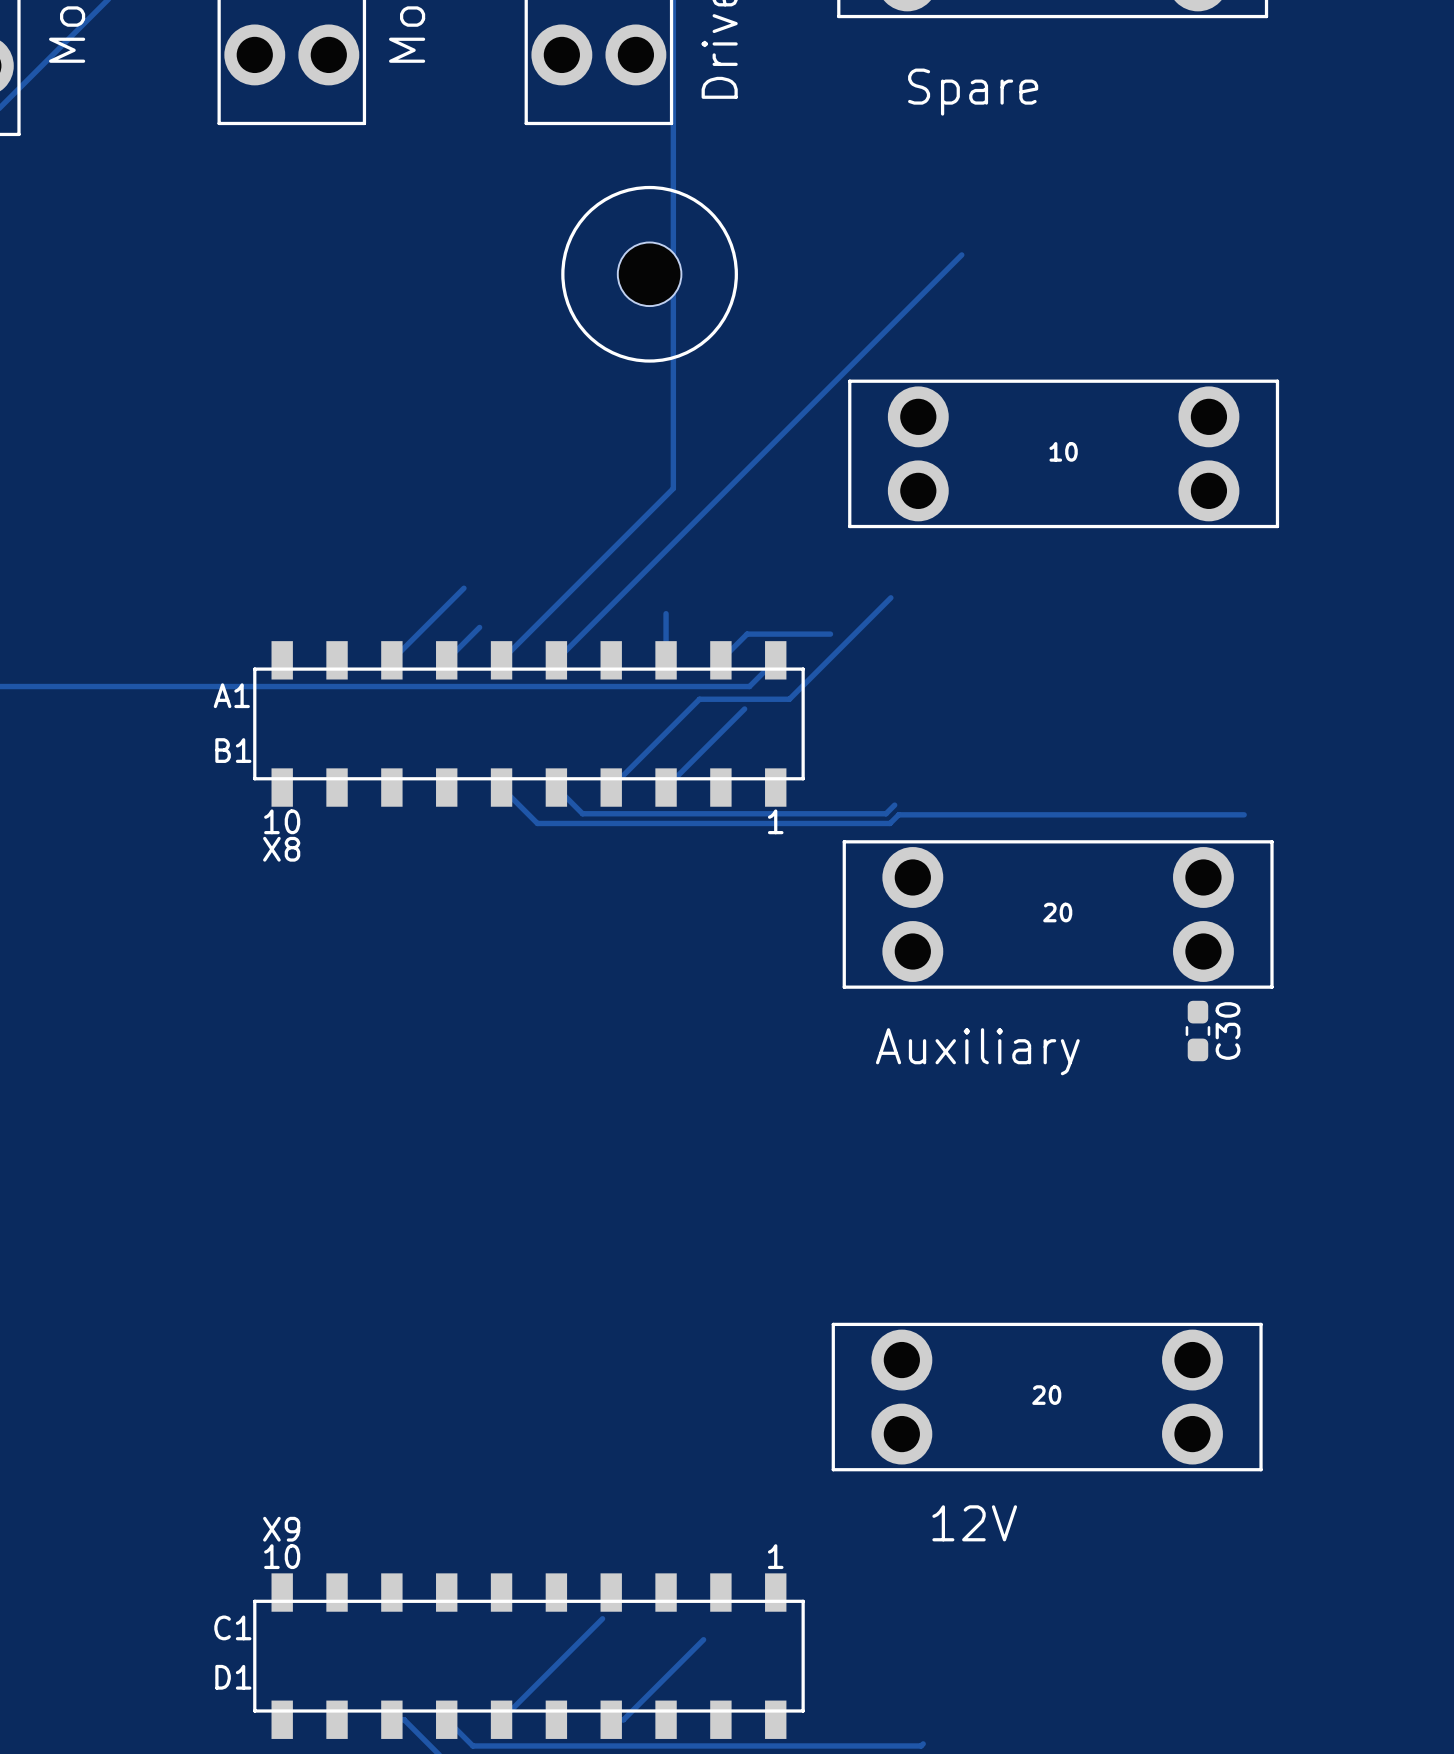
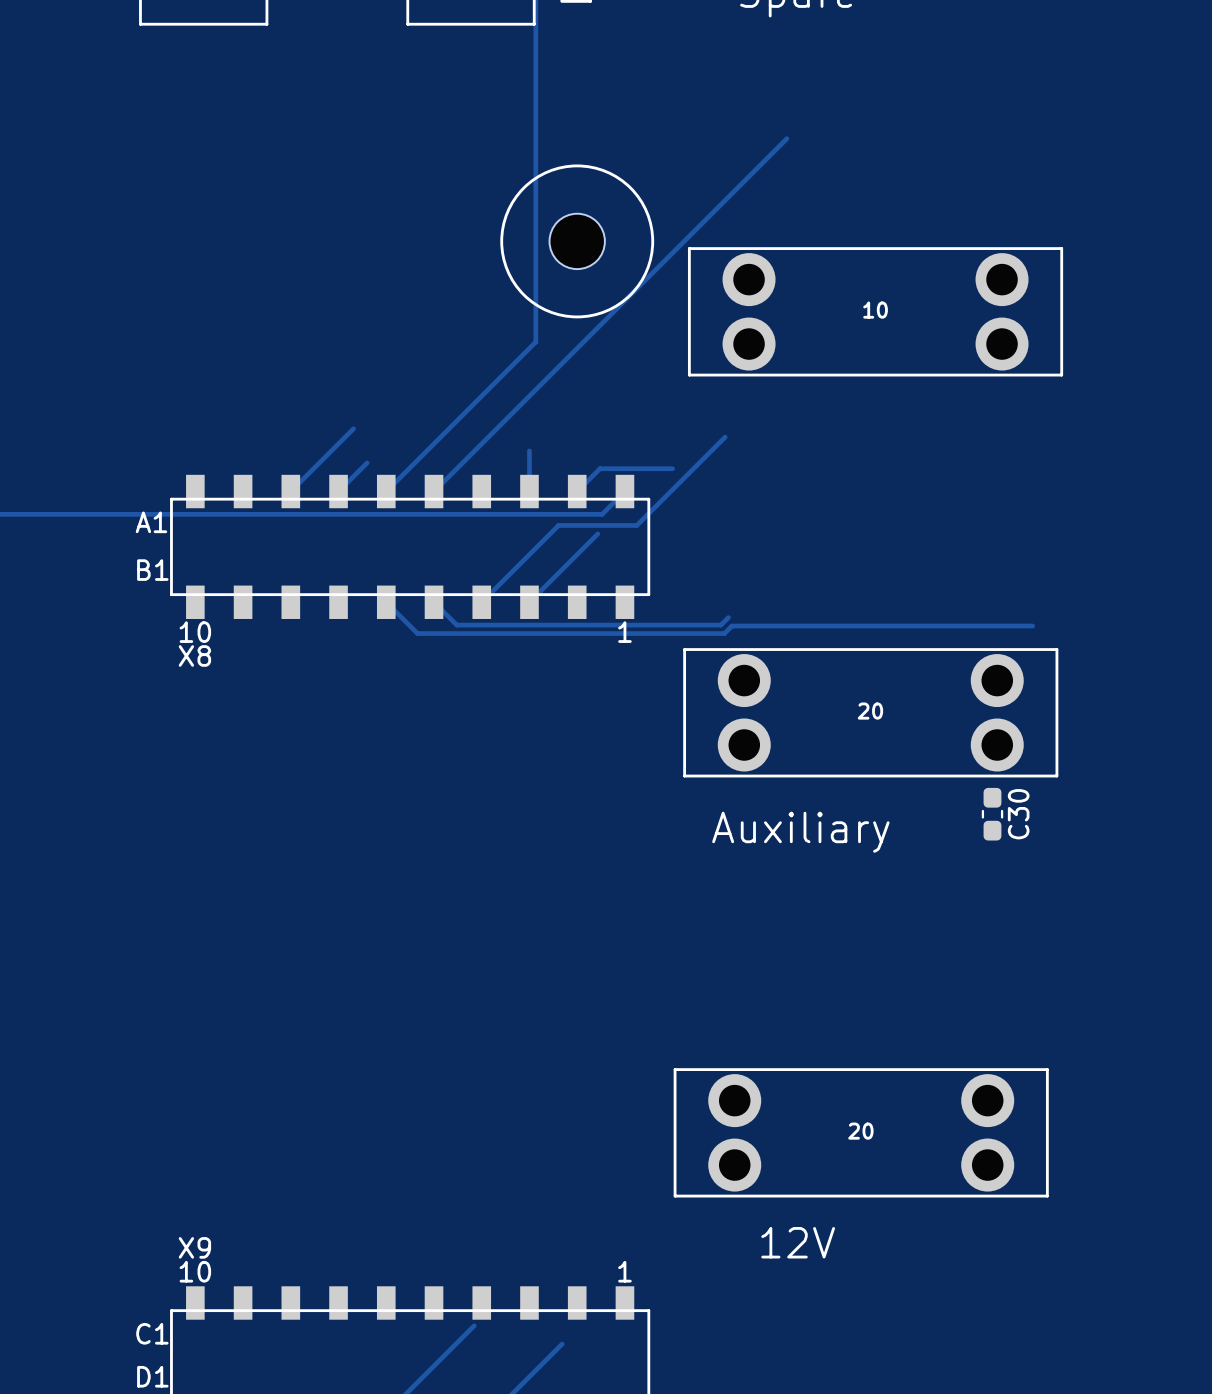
part position: (649, 274) -> (577, 241)

